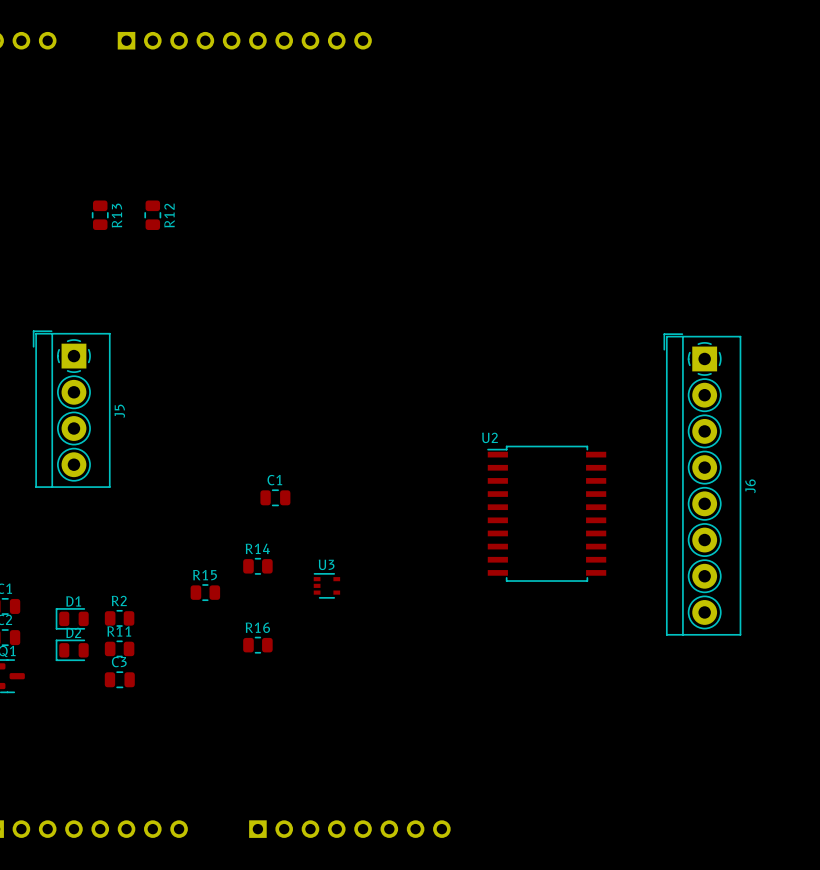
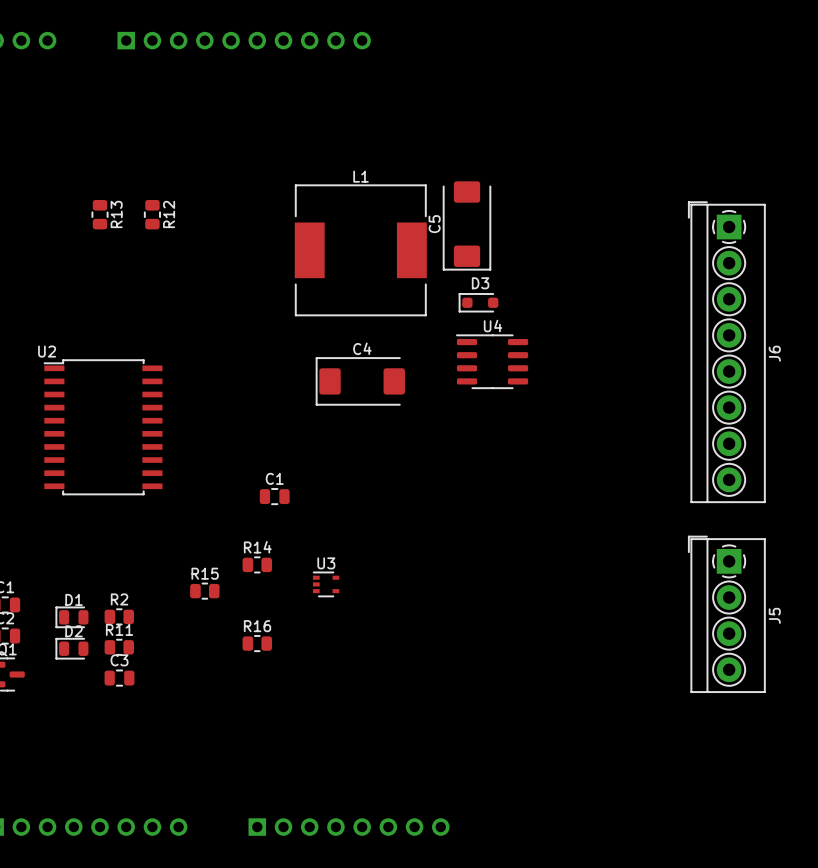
C5: none -> (466, 225)
L1: none -> (360, 250)
D3: none -> (478, 302)
U4: none -> (492, 361)
C4: none -> (360, 381)
J5 position: (71, 409) -> (726, 614)
J6 position: (702, 484) -> (726, 352)
U2 position: (546, 513) -> (103, 427)

